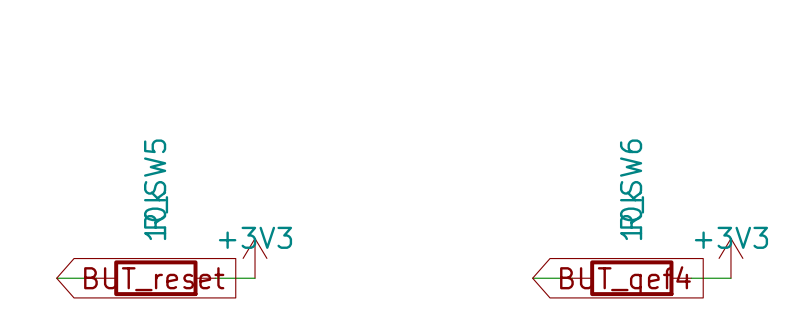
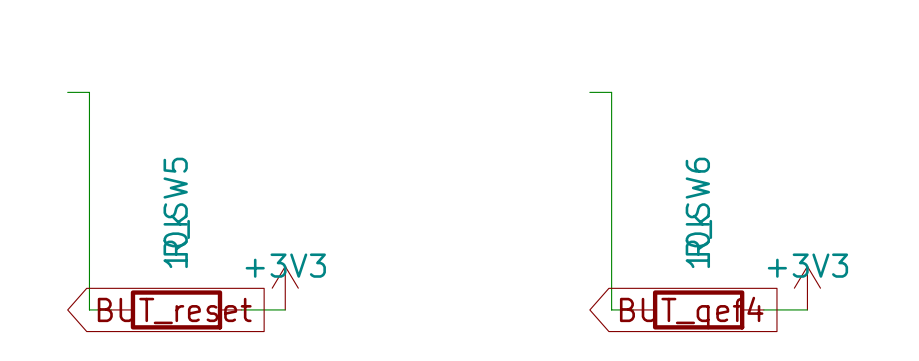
wire: (56, 278) (76, 278) -> (67, 92) (89, 92) (89, 309)
wire: (532, 278) (552, 278) -> (589, 92) (611, 92) (611, 309)

